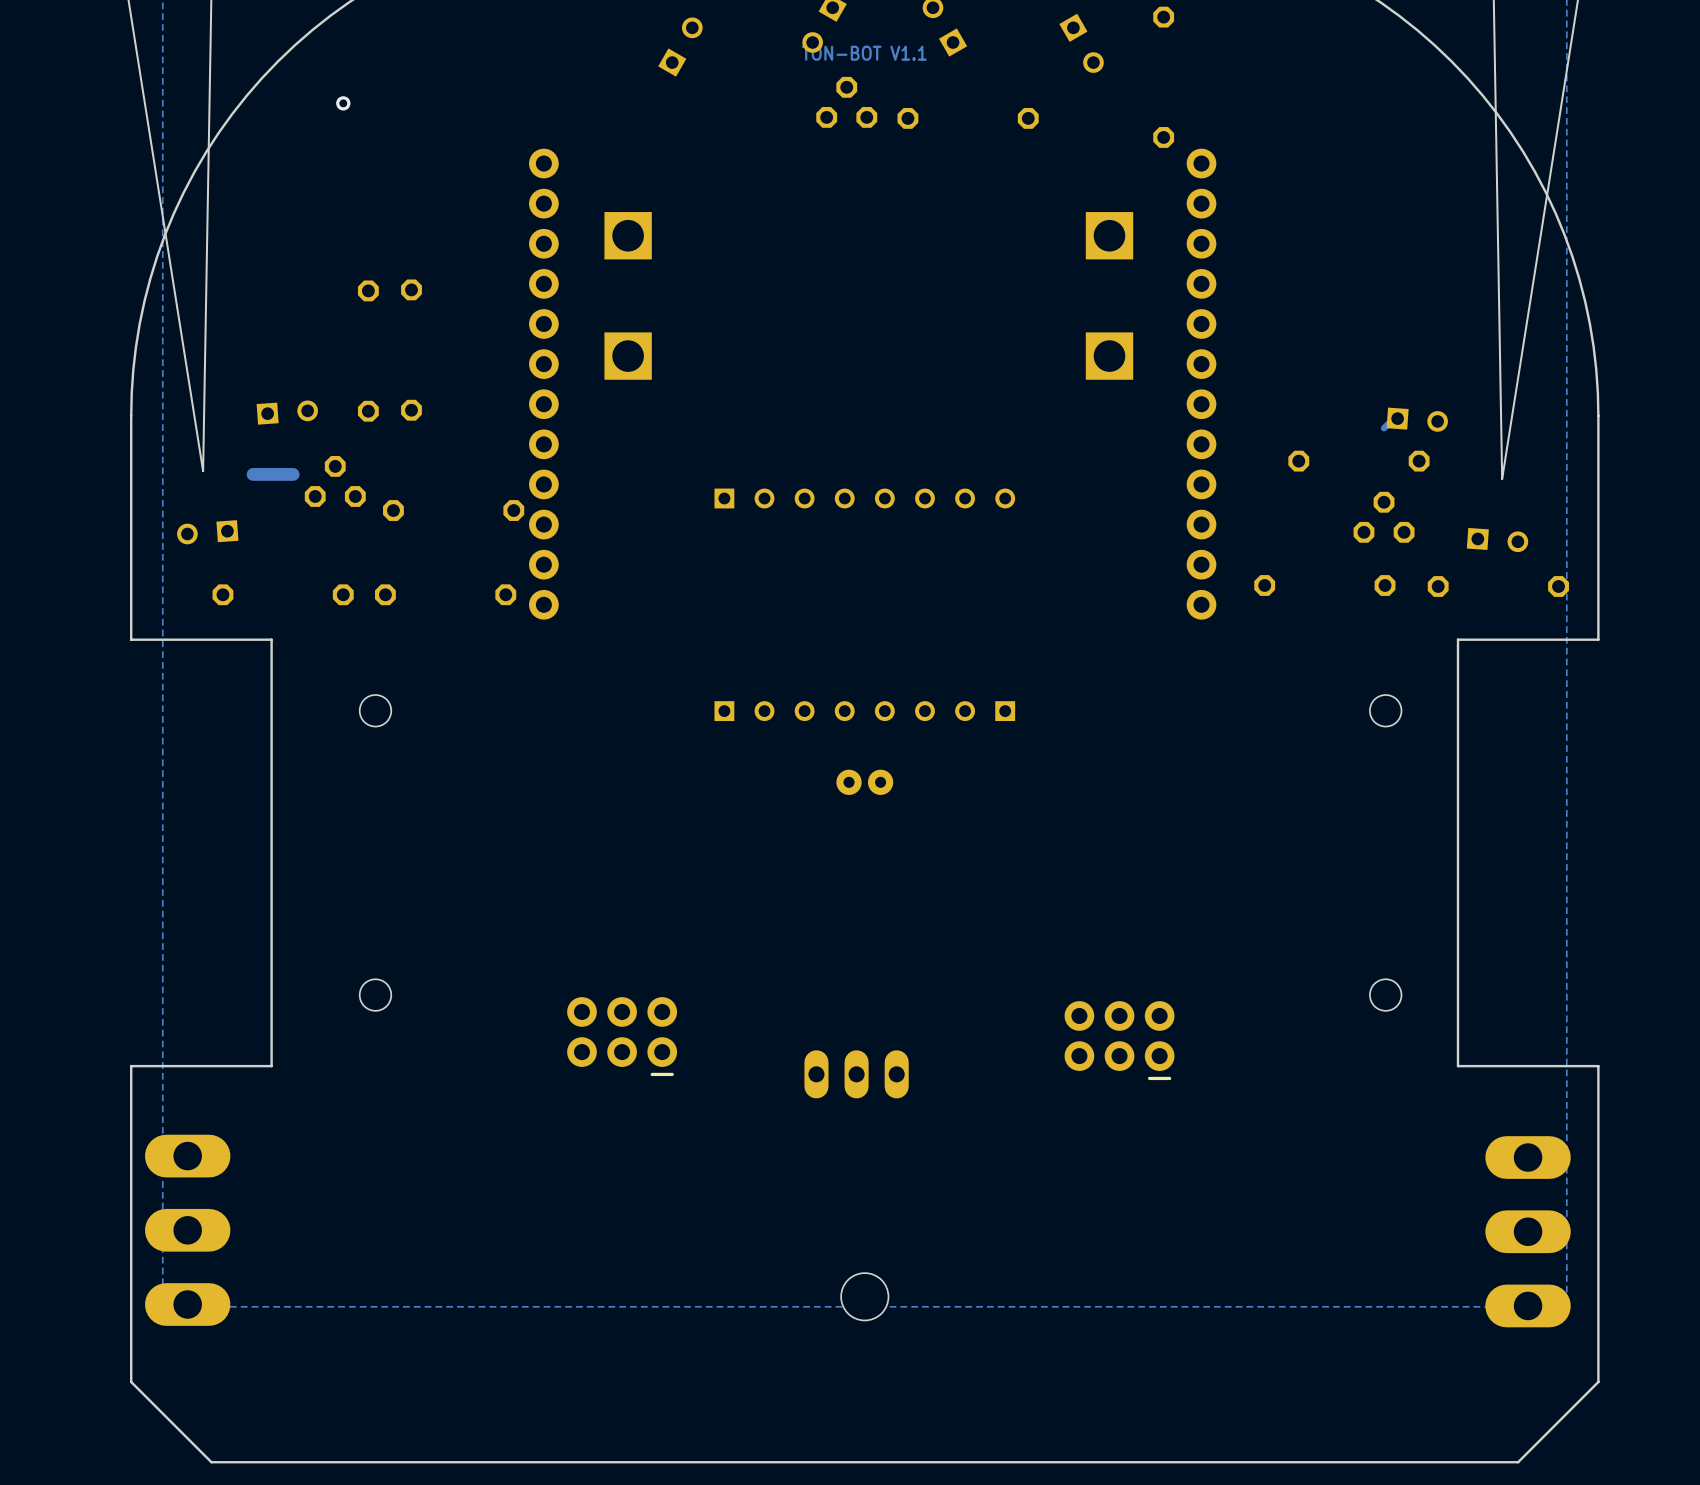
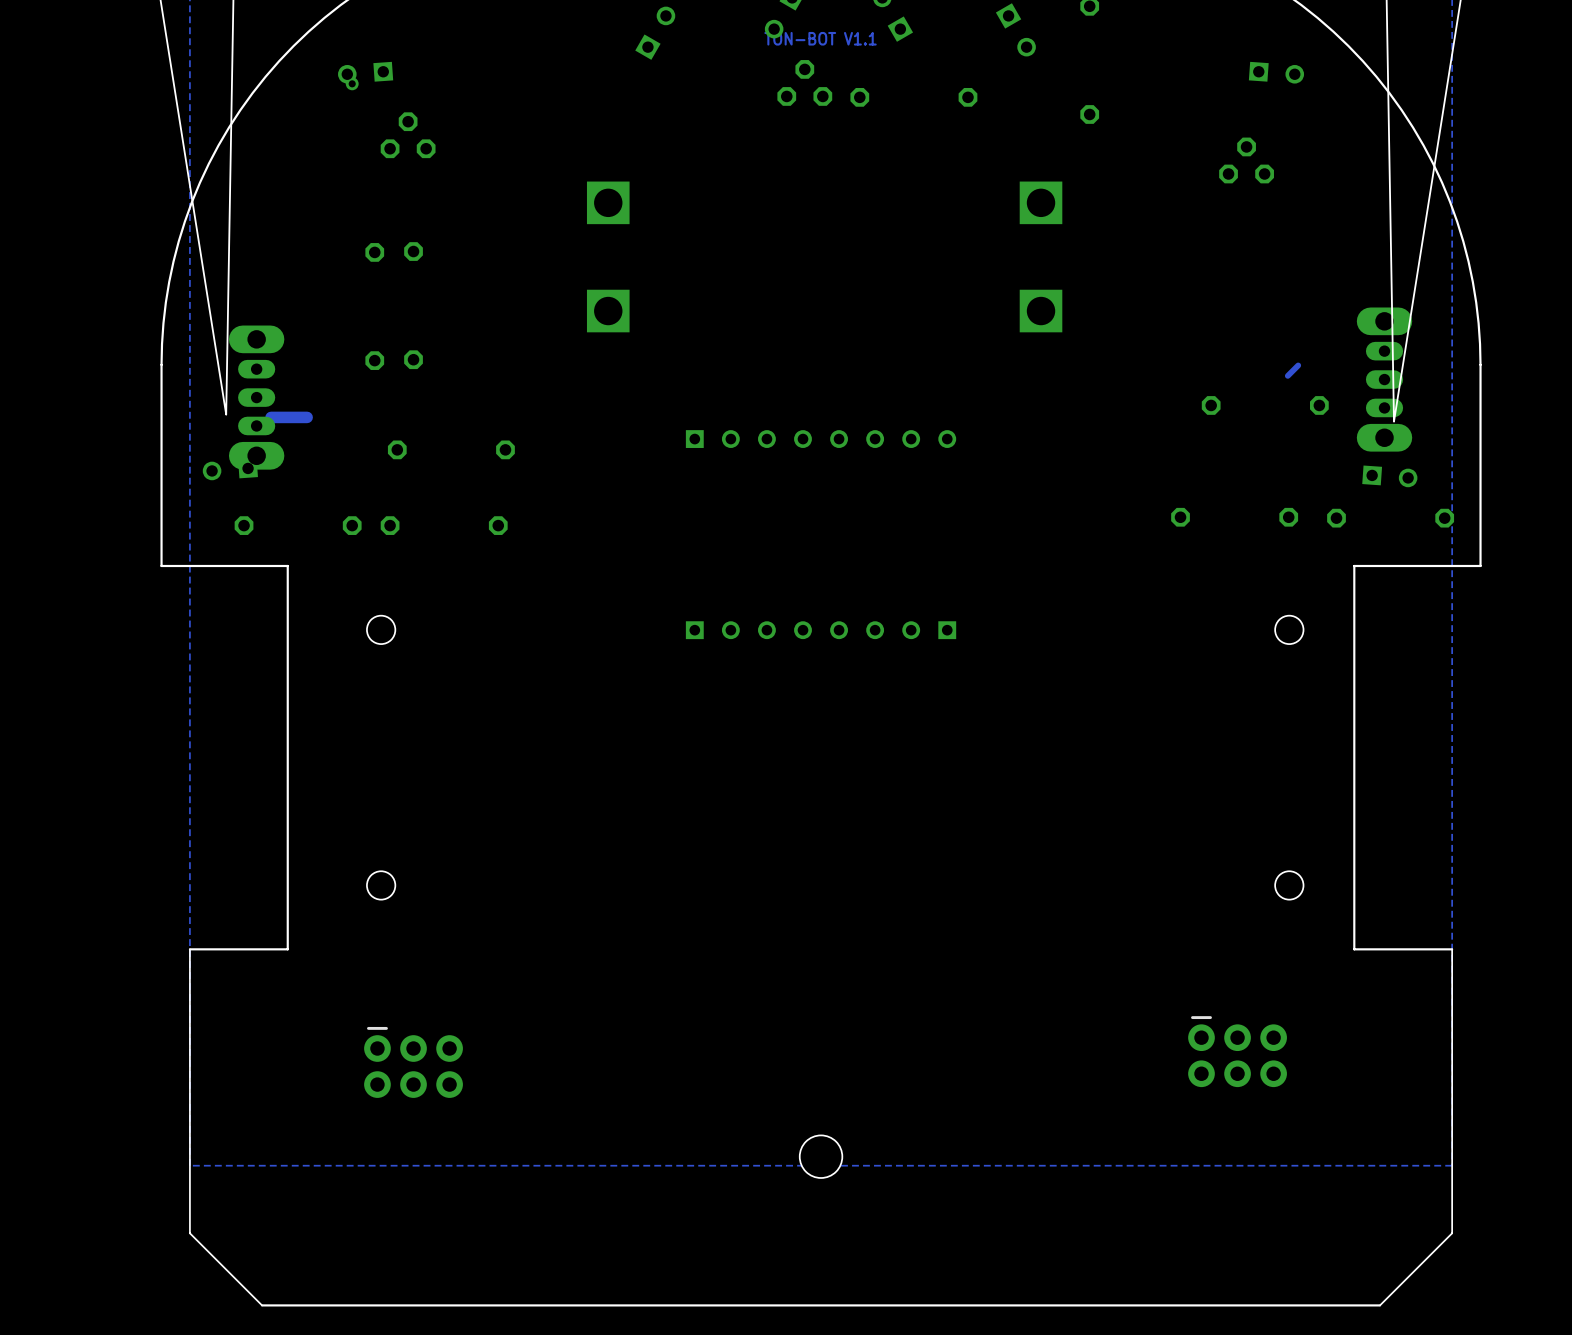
part: (543, 384) -> none
part: (1201, 384) -> none
part rotation: 0° (287, 412) -> 180° (365, 72)
part position: (287, 412) -> (365, 72)
part position: (1417, 419) -> (1276, 72)
part: none -> (1384, 379)
part: none -> (256, 397)
part position: (335, 481) -> (408, 135)
part position: (1384, 517) -> (1246, 160)
part: (864, 782) -> none
part rotation: 0° (622, 1036) -> 180° (413, 1062)
part position: (622, 1036) -> (413, 1062)
part rotation: 0° (1119, 1040) -> 180° (1237, 1051)
part position: (1119, 1040) -> (1237, 1051)
board edge: (162, 1066) (131, 1066) (131, 1381) (211, 1462) (243, 1462) -> (189, 949) (189, 1233) (262, 1305)
board edge: (1566, 1066) (1598, 1066) (1598, 1381) (1518, 1462) (1486, 1462) -> (1452, 949) (1452, 1233) (1380, 1305)
part: (856, 1074) -> none
part: (187, 1230) -> none
part: (1528, 1231) -> none

